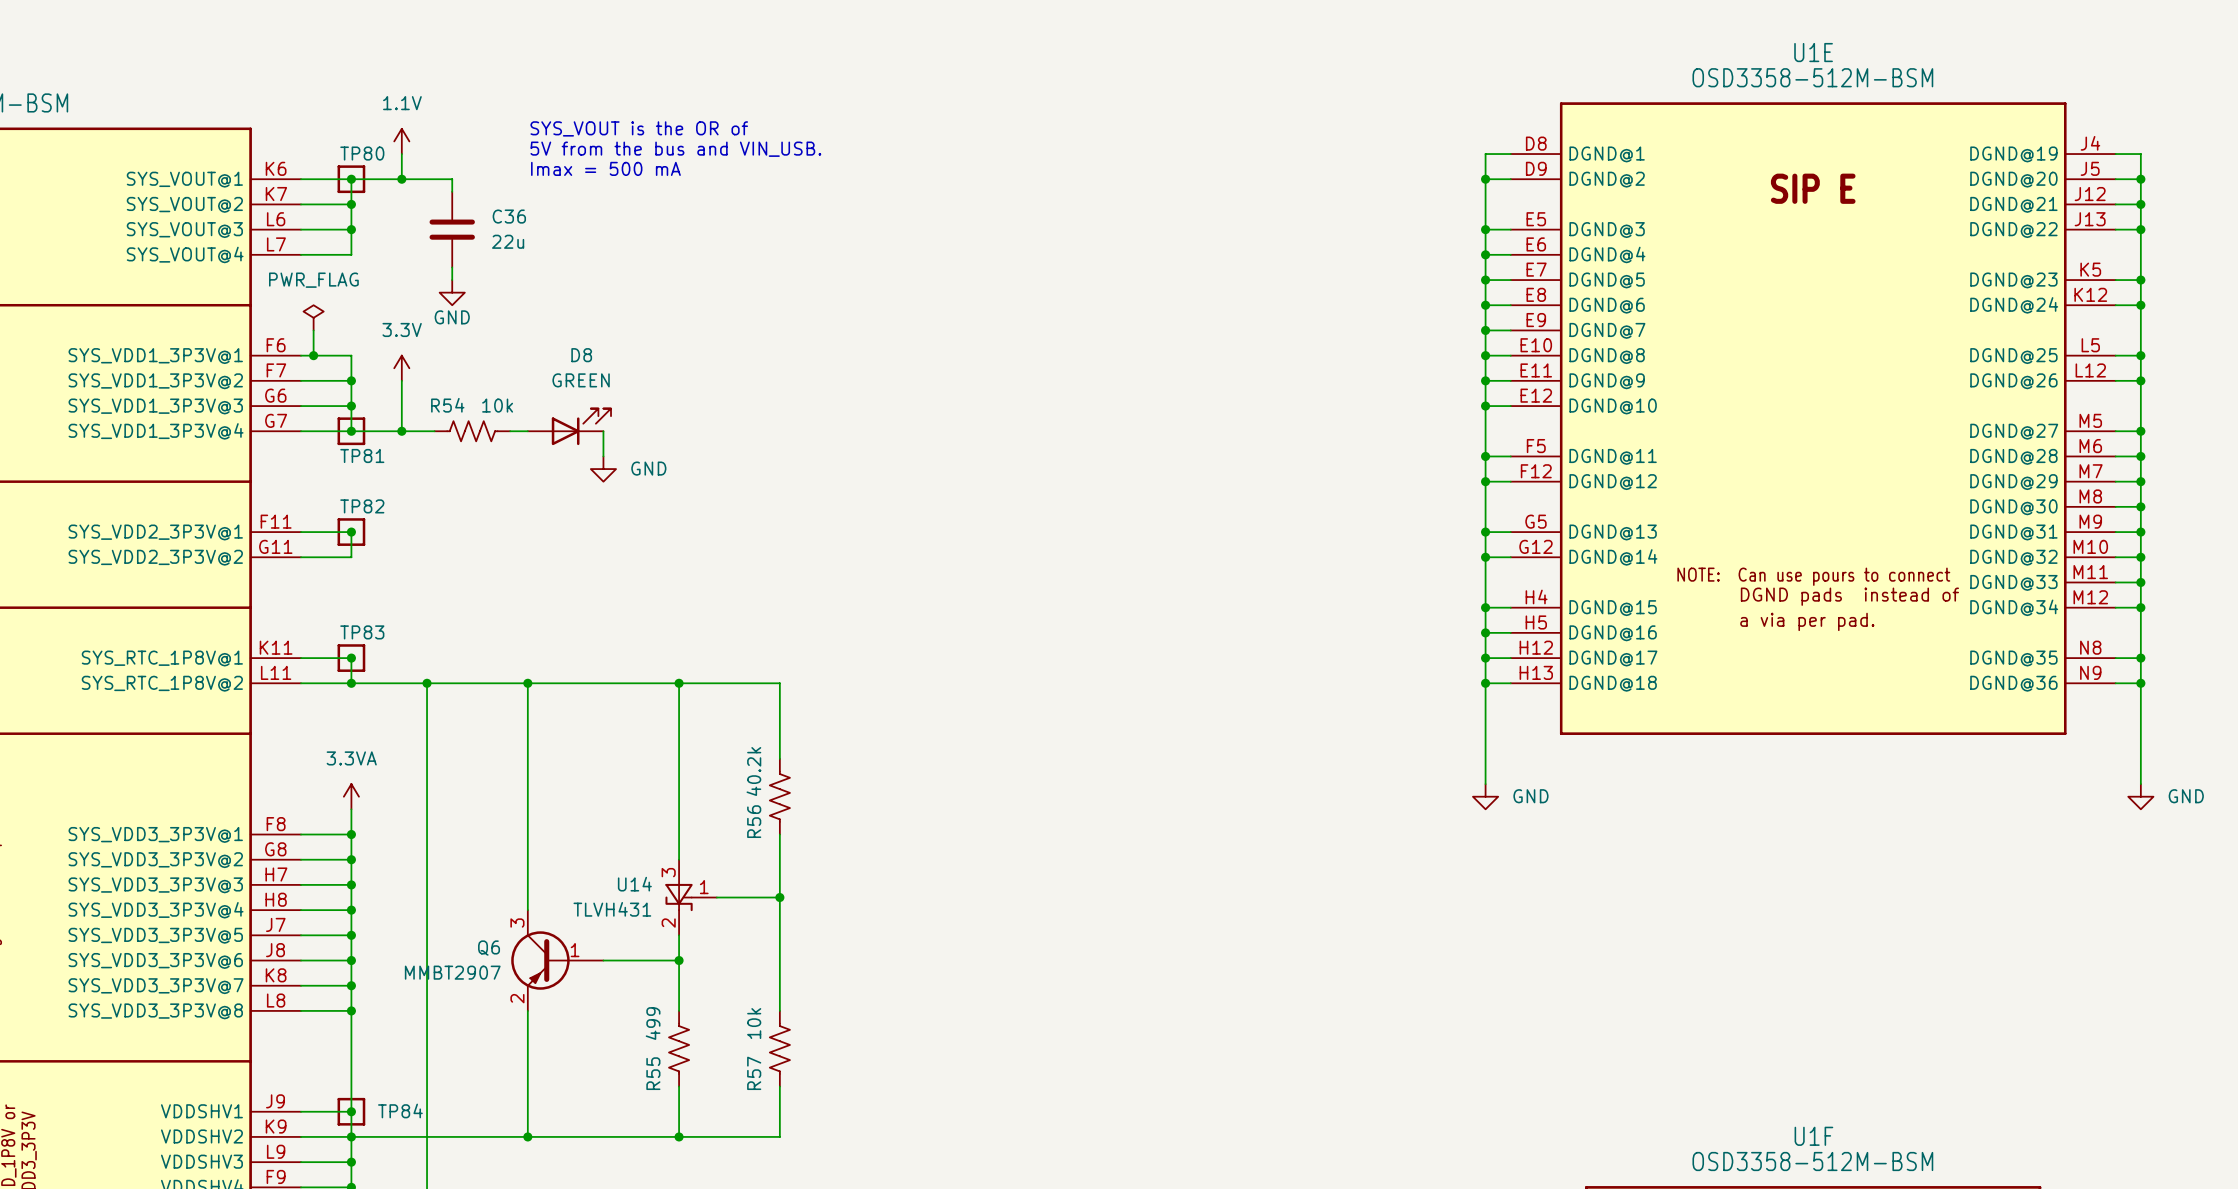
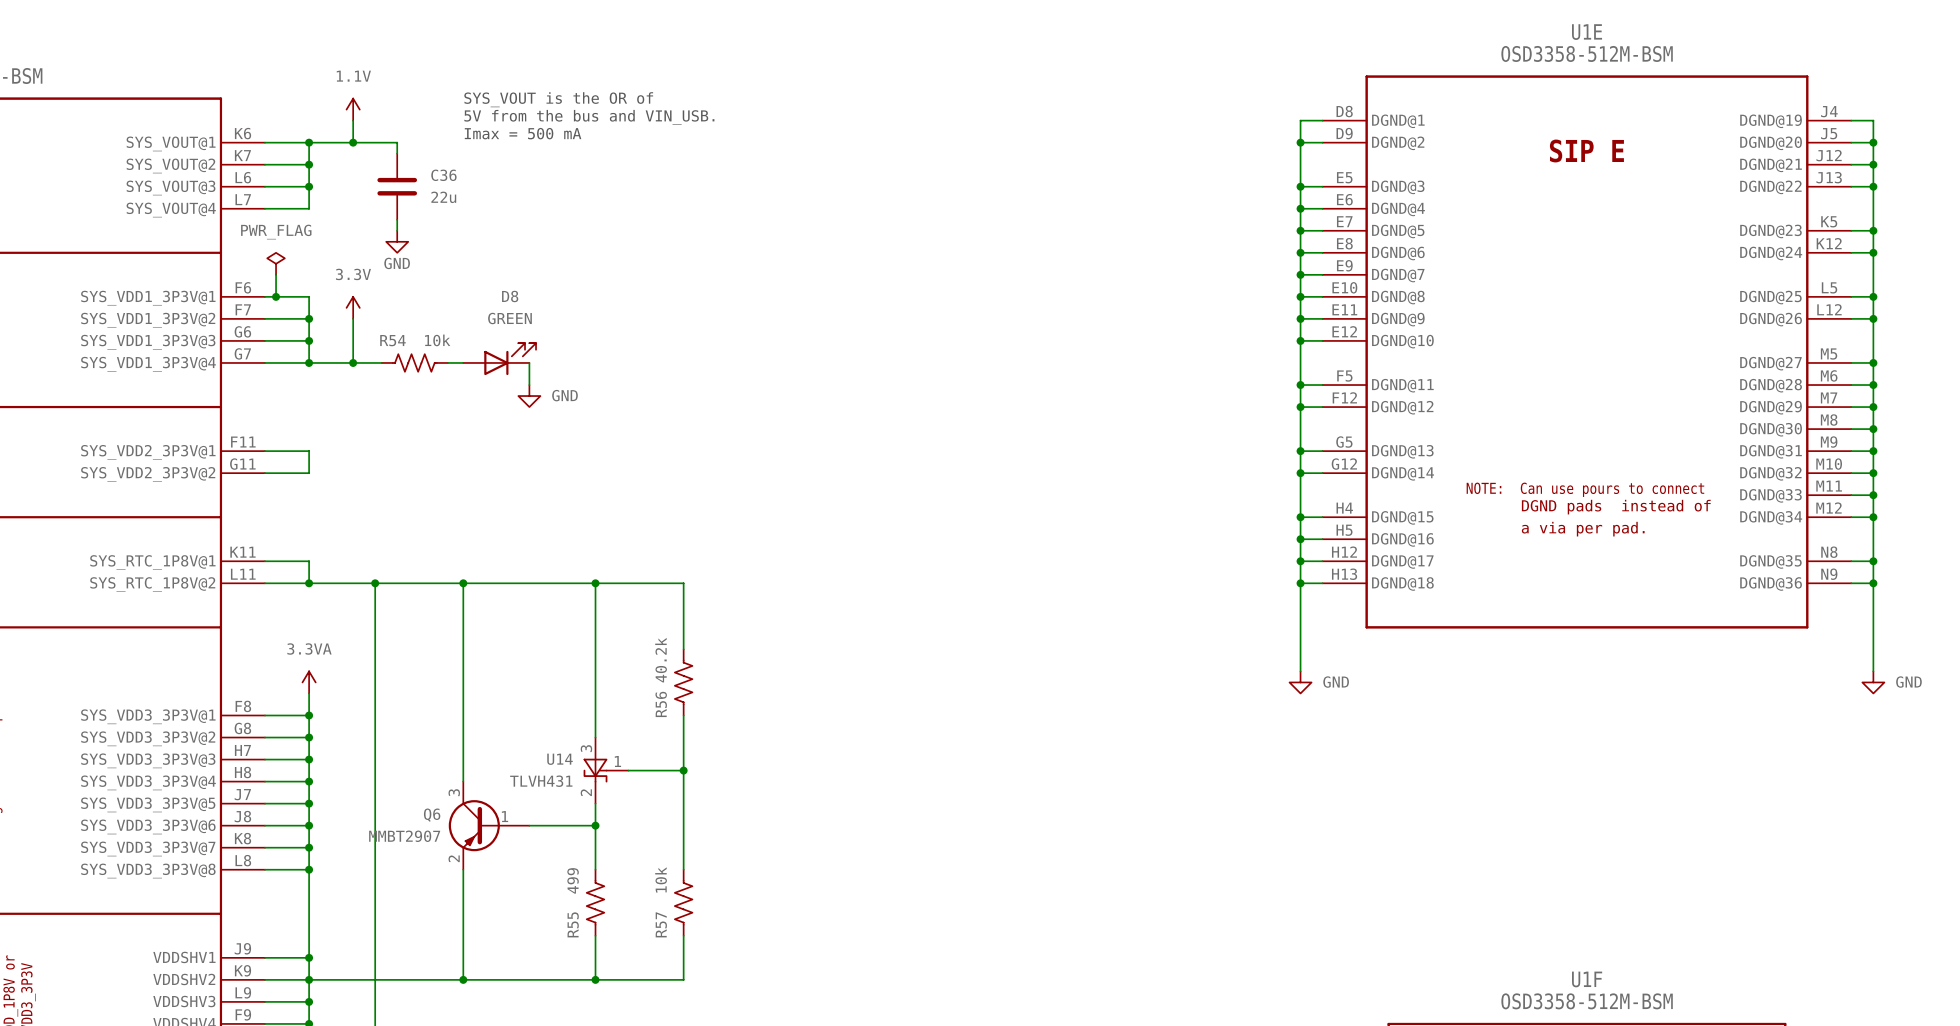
TP80: (351, 179) -> none
TP81: (351, 431) -> none
junction: (351, 532) -> none
TP82: (351, 532) -> none
junction: (351, 658) -> none
TP83: (351, 658) -> none
TP84: (351, 1111) -> none

